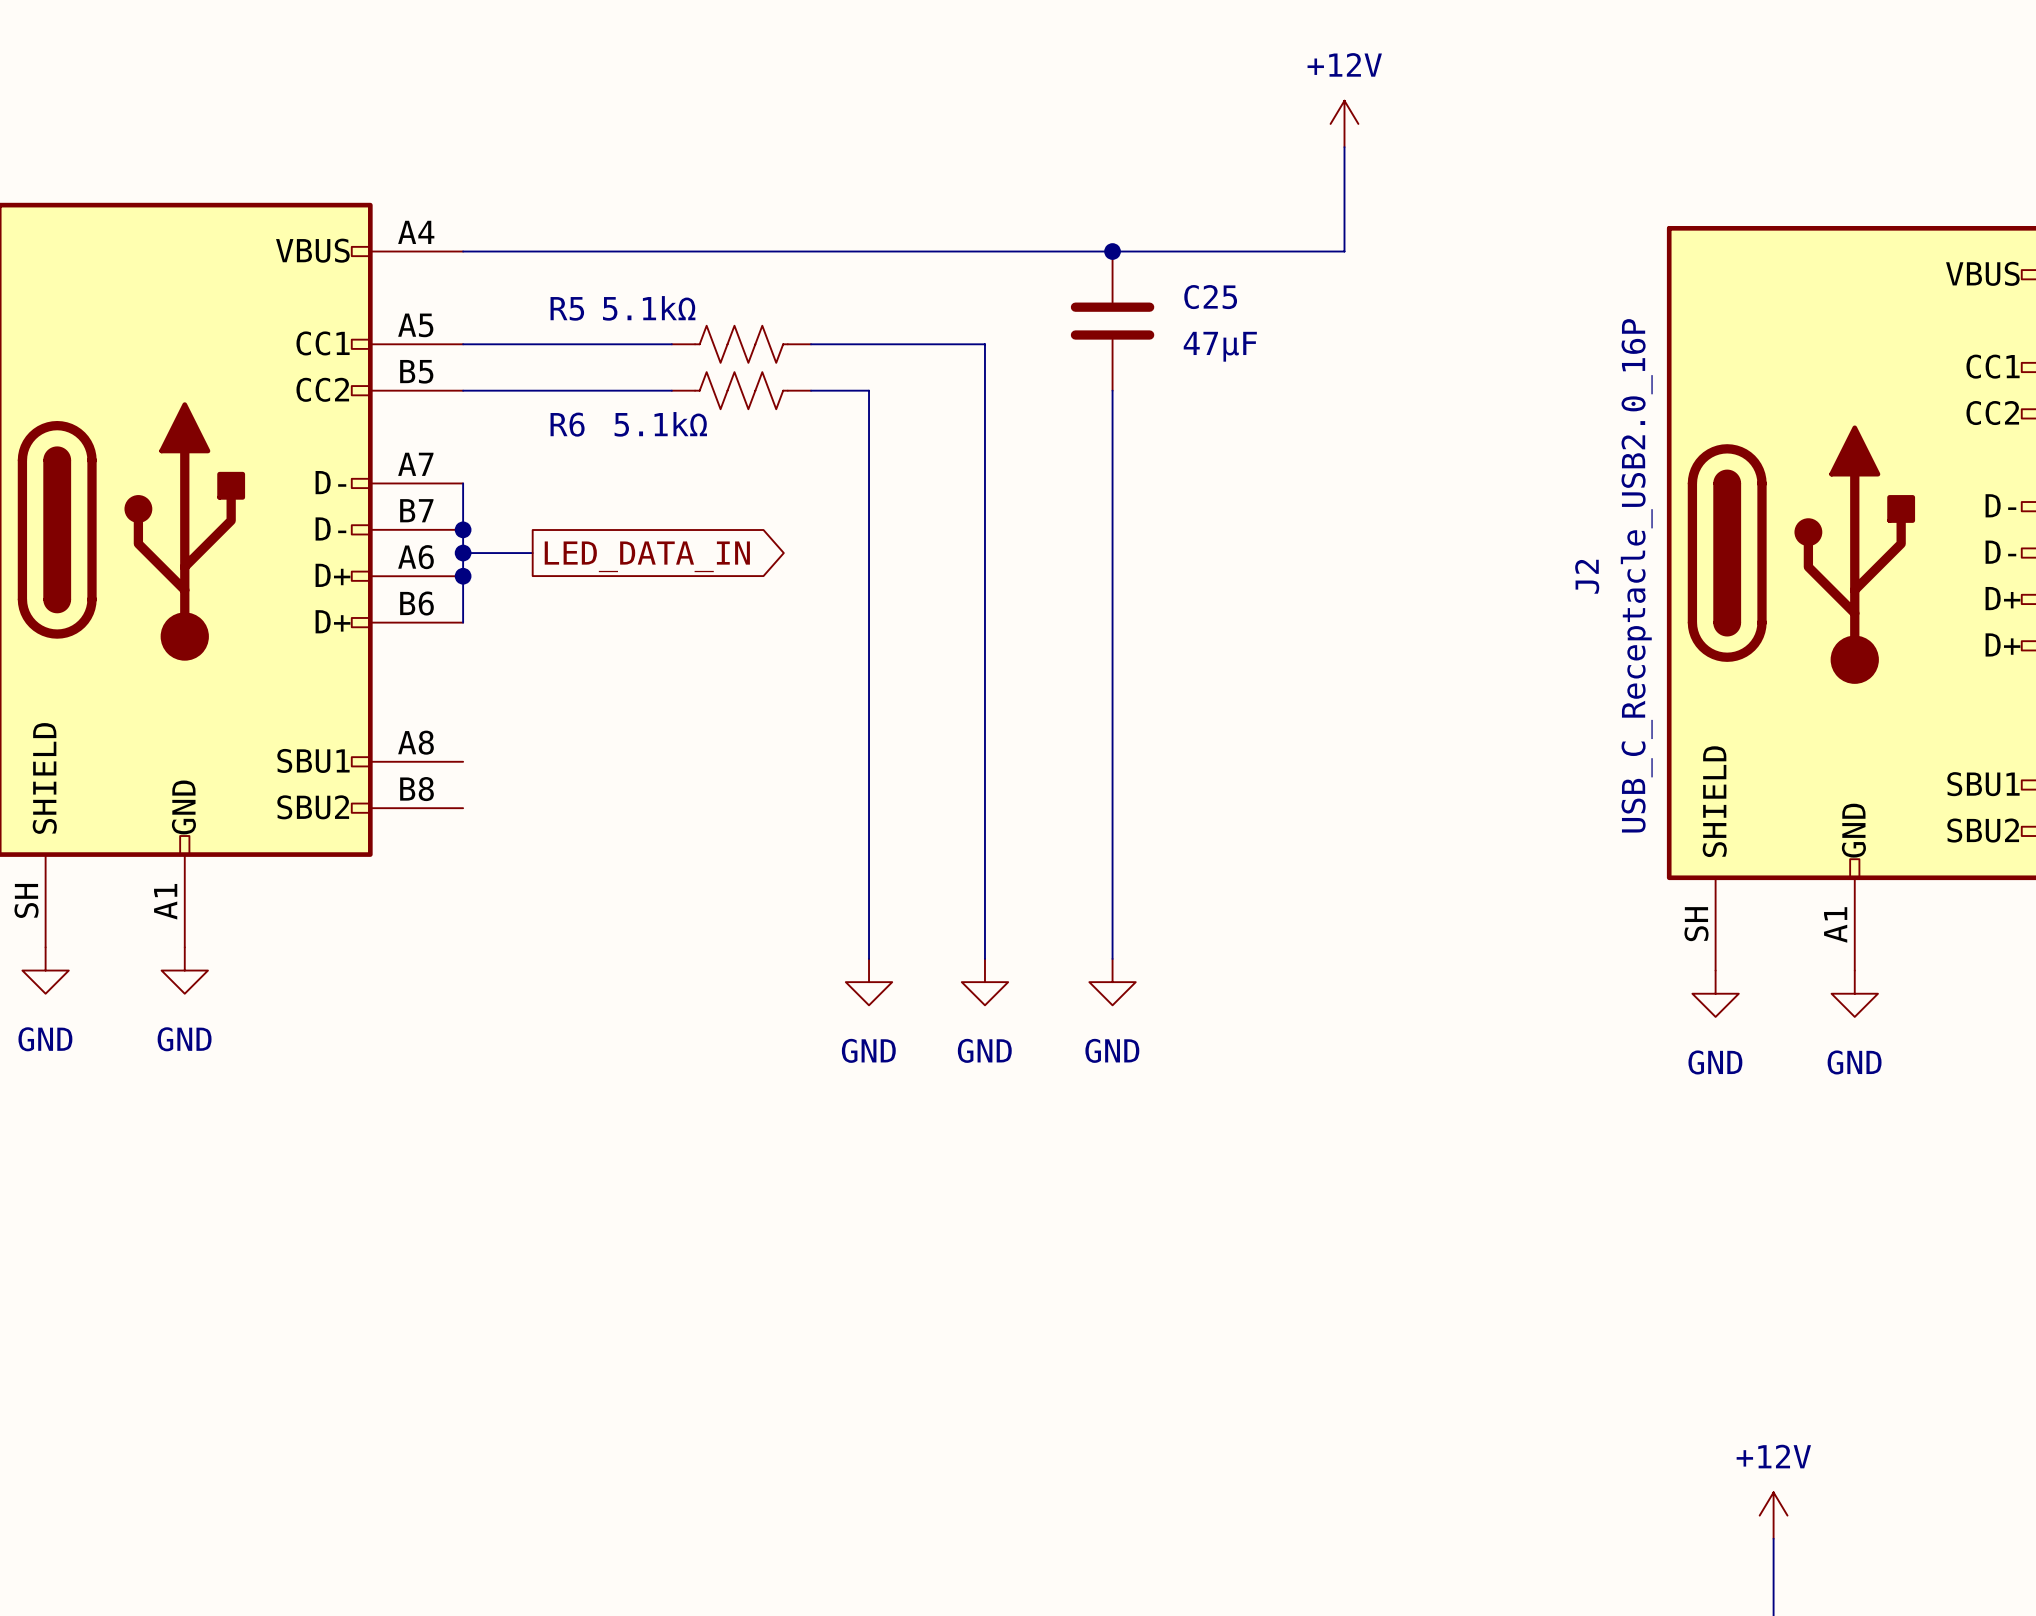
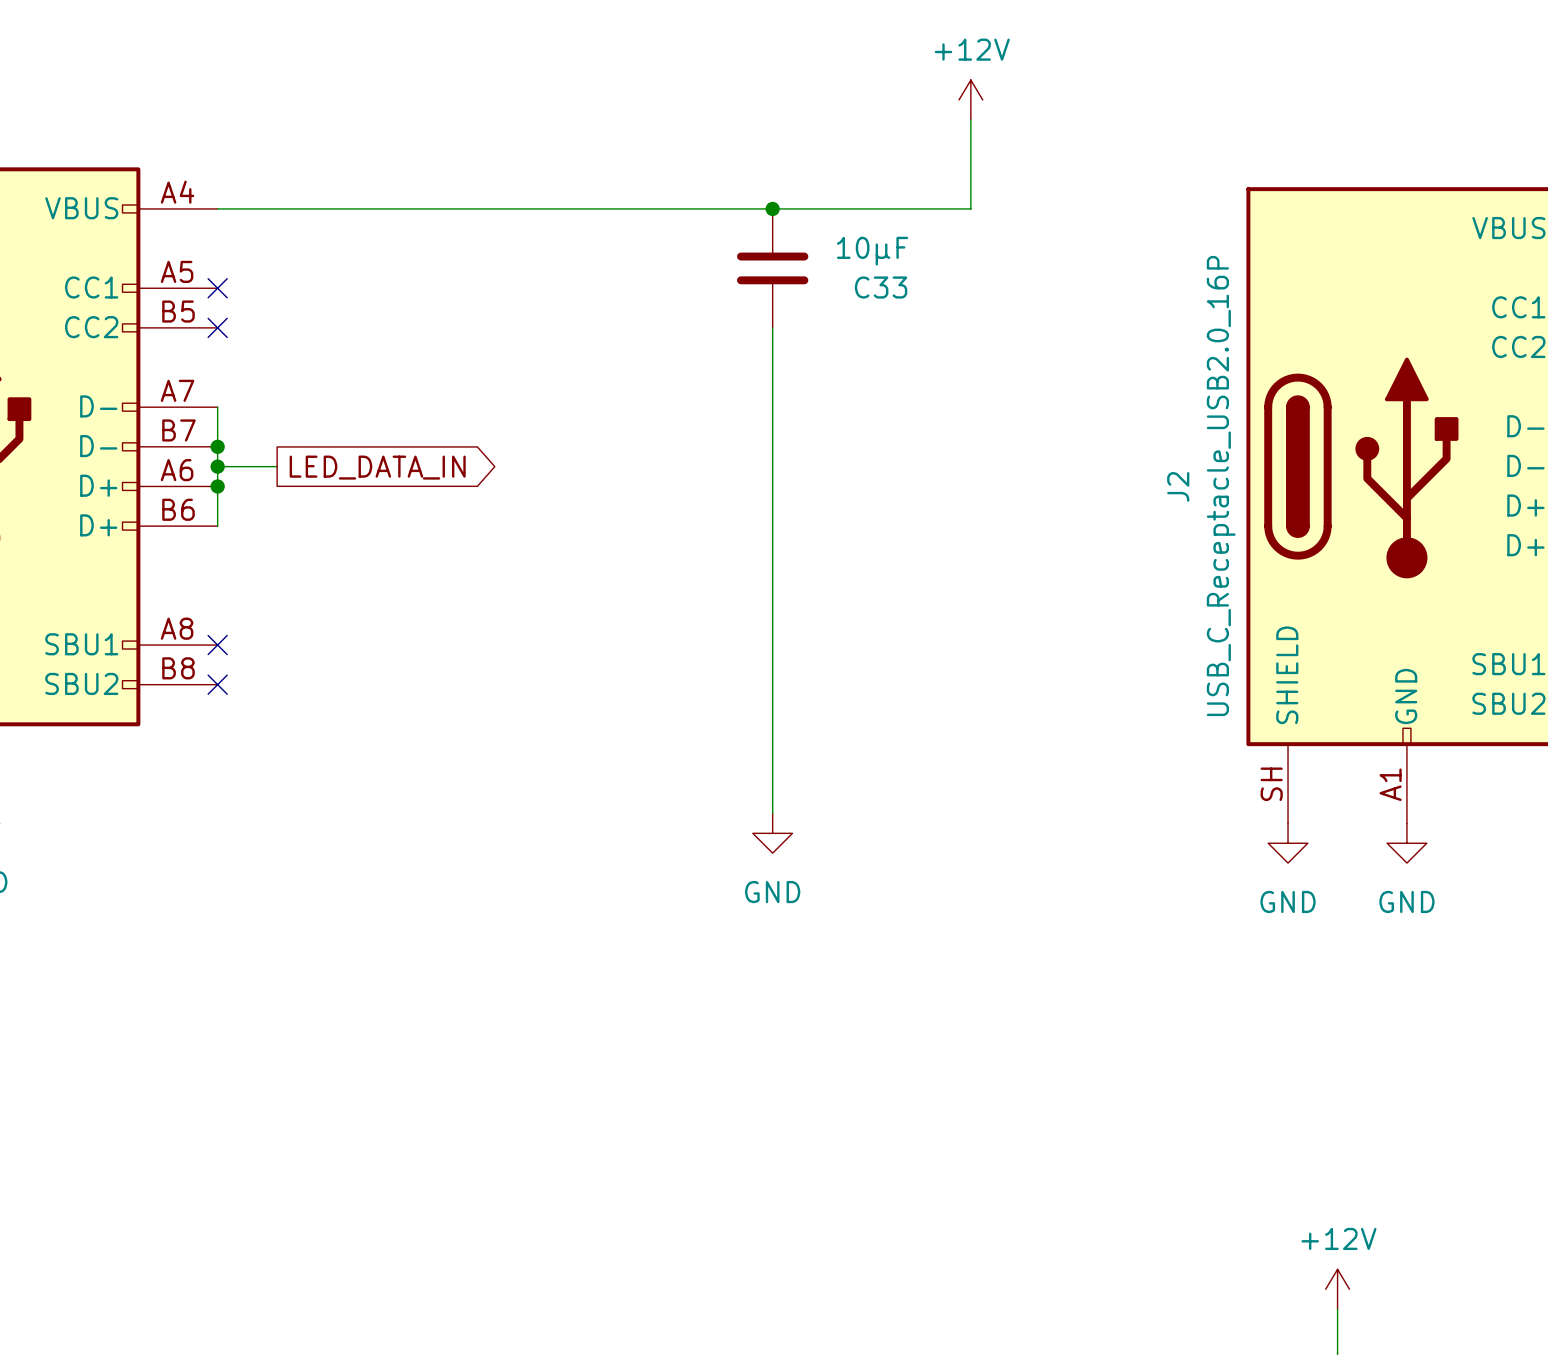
C25 name: C25 (1210, 297) -> C33 (881, 287)
wire: (463, 344) (671, 344) -> none
no-connect mark: none -> (217, 288)
R5: 5.1kΩ (741, 344) -> none
wire: (811, 344) (984, 344) (984, 958) -> none
C25 value: 47µF (1220, 346) -> 10µF (872, 251)
wire: (463, 390) (671, 390) -> none
no-connect mark: none -> (217, 327)
R6: 5.1kΩ (741, 390) -> none
wire: (811, 390) (869, 390) (869, 958) -> none
no-connect mark: none -> (217, 645)
no-connect mark: none -> (217, 684)
power symbol: GND (869, 982) -> none
power symbol: GND (984, 982) -> none

